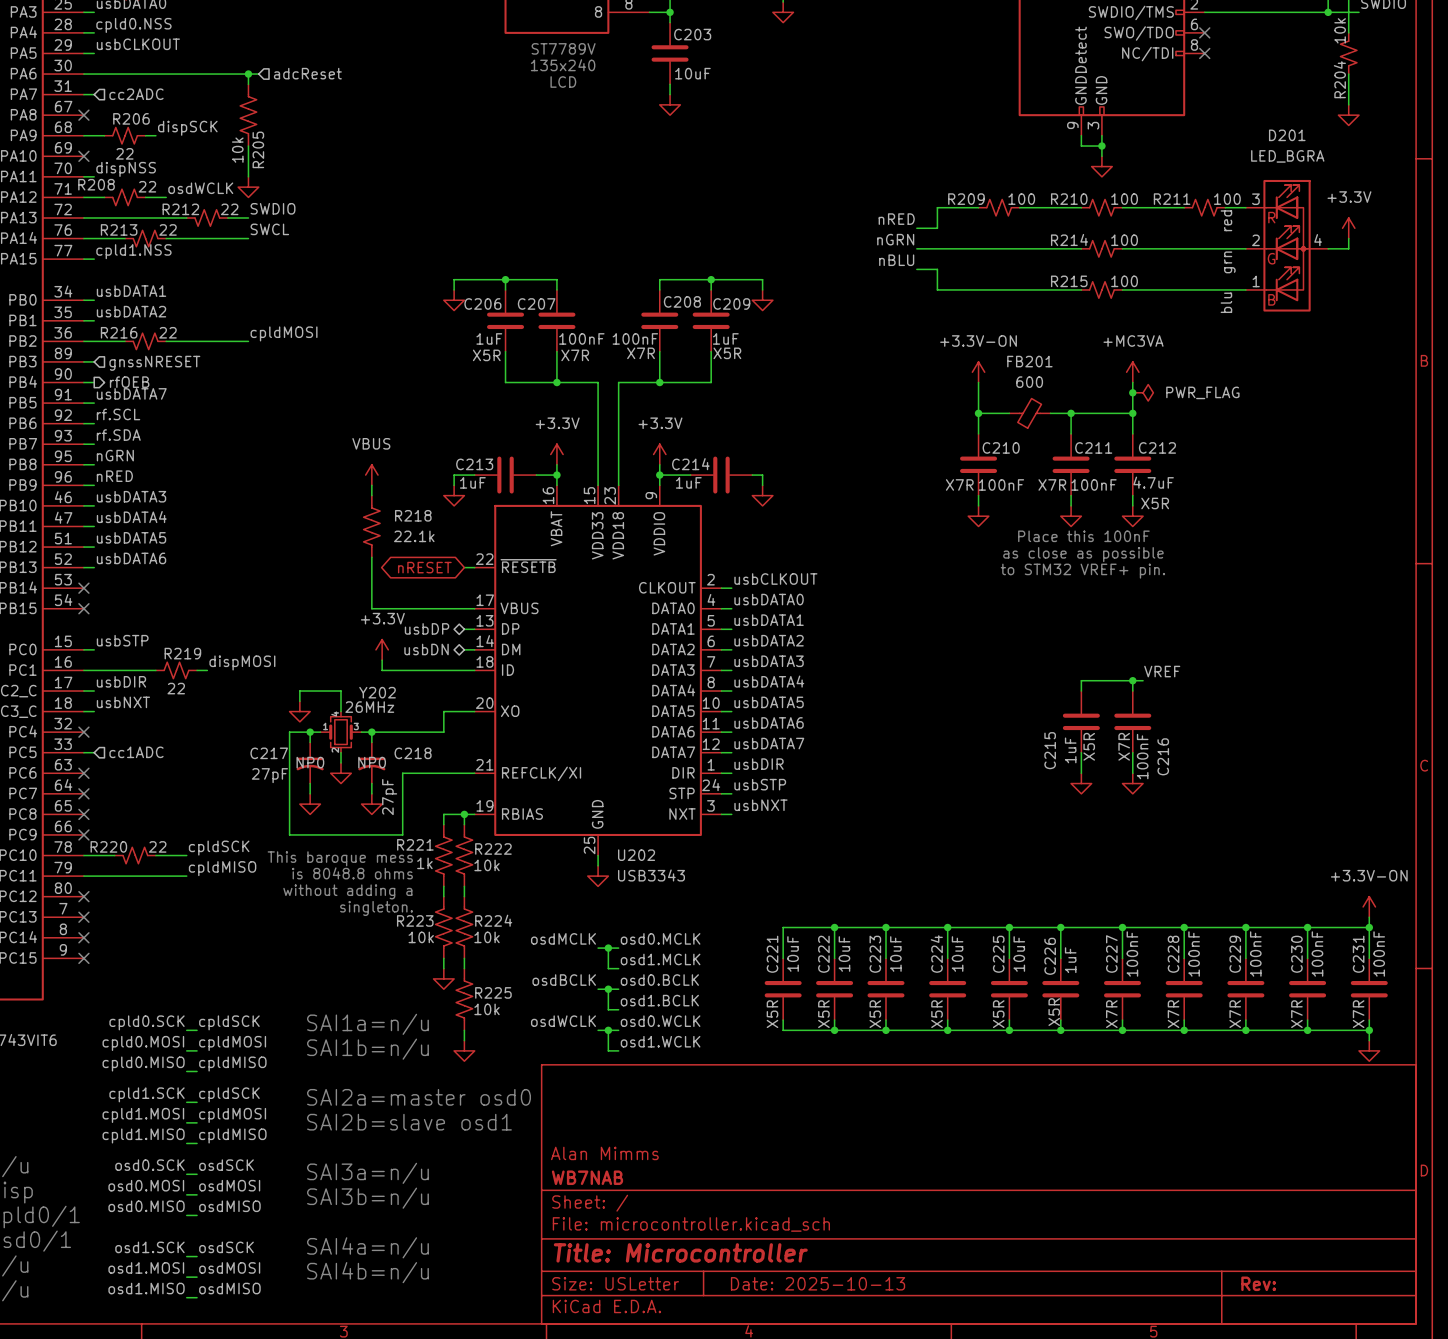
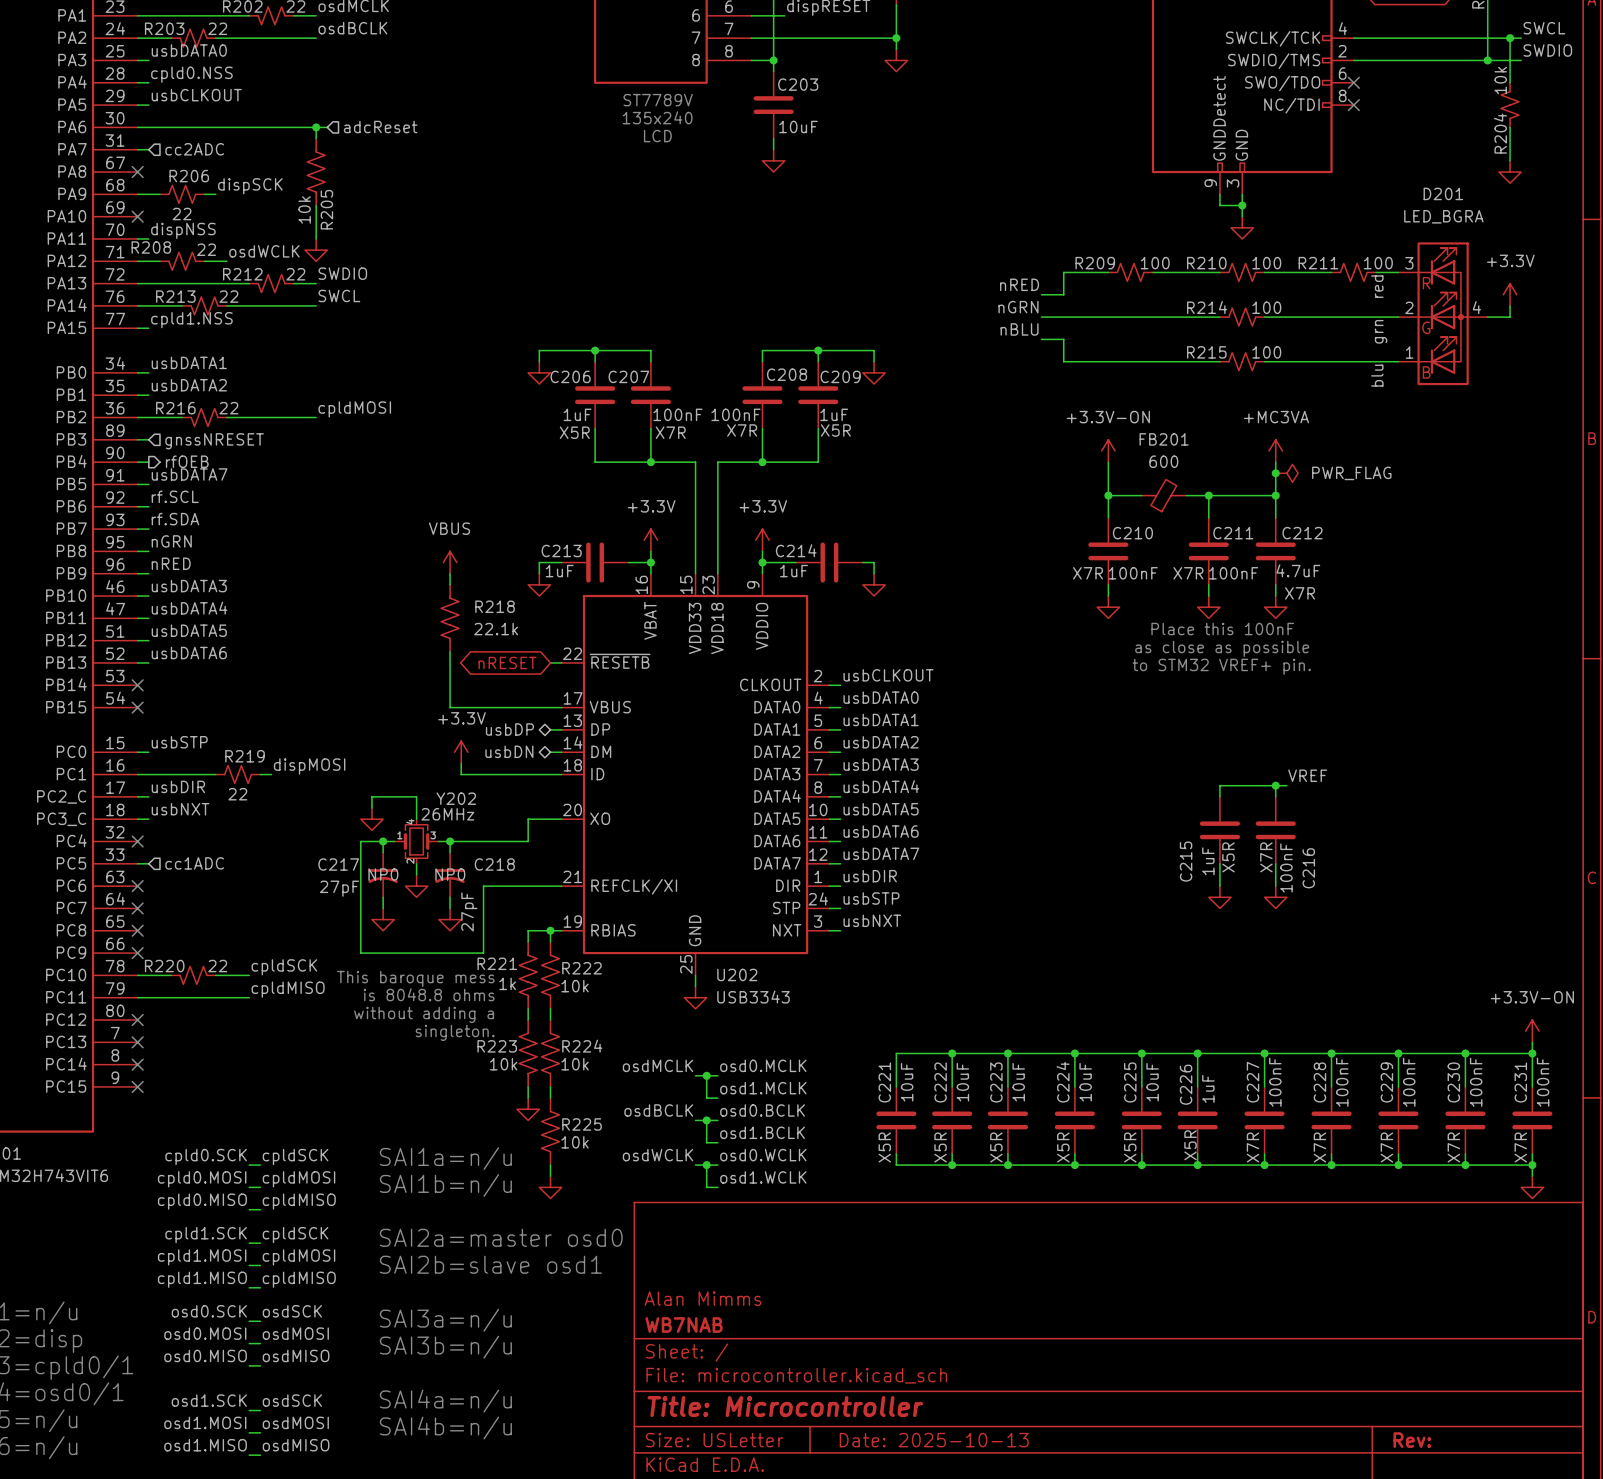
C212 text: X5R (1155, 503) -> X7R (1300, 593)

